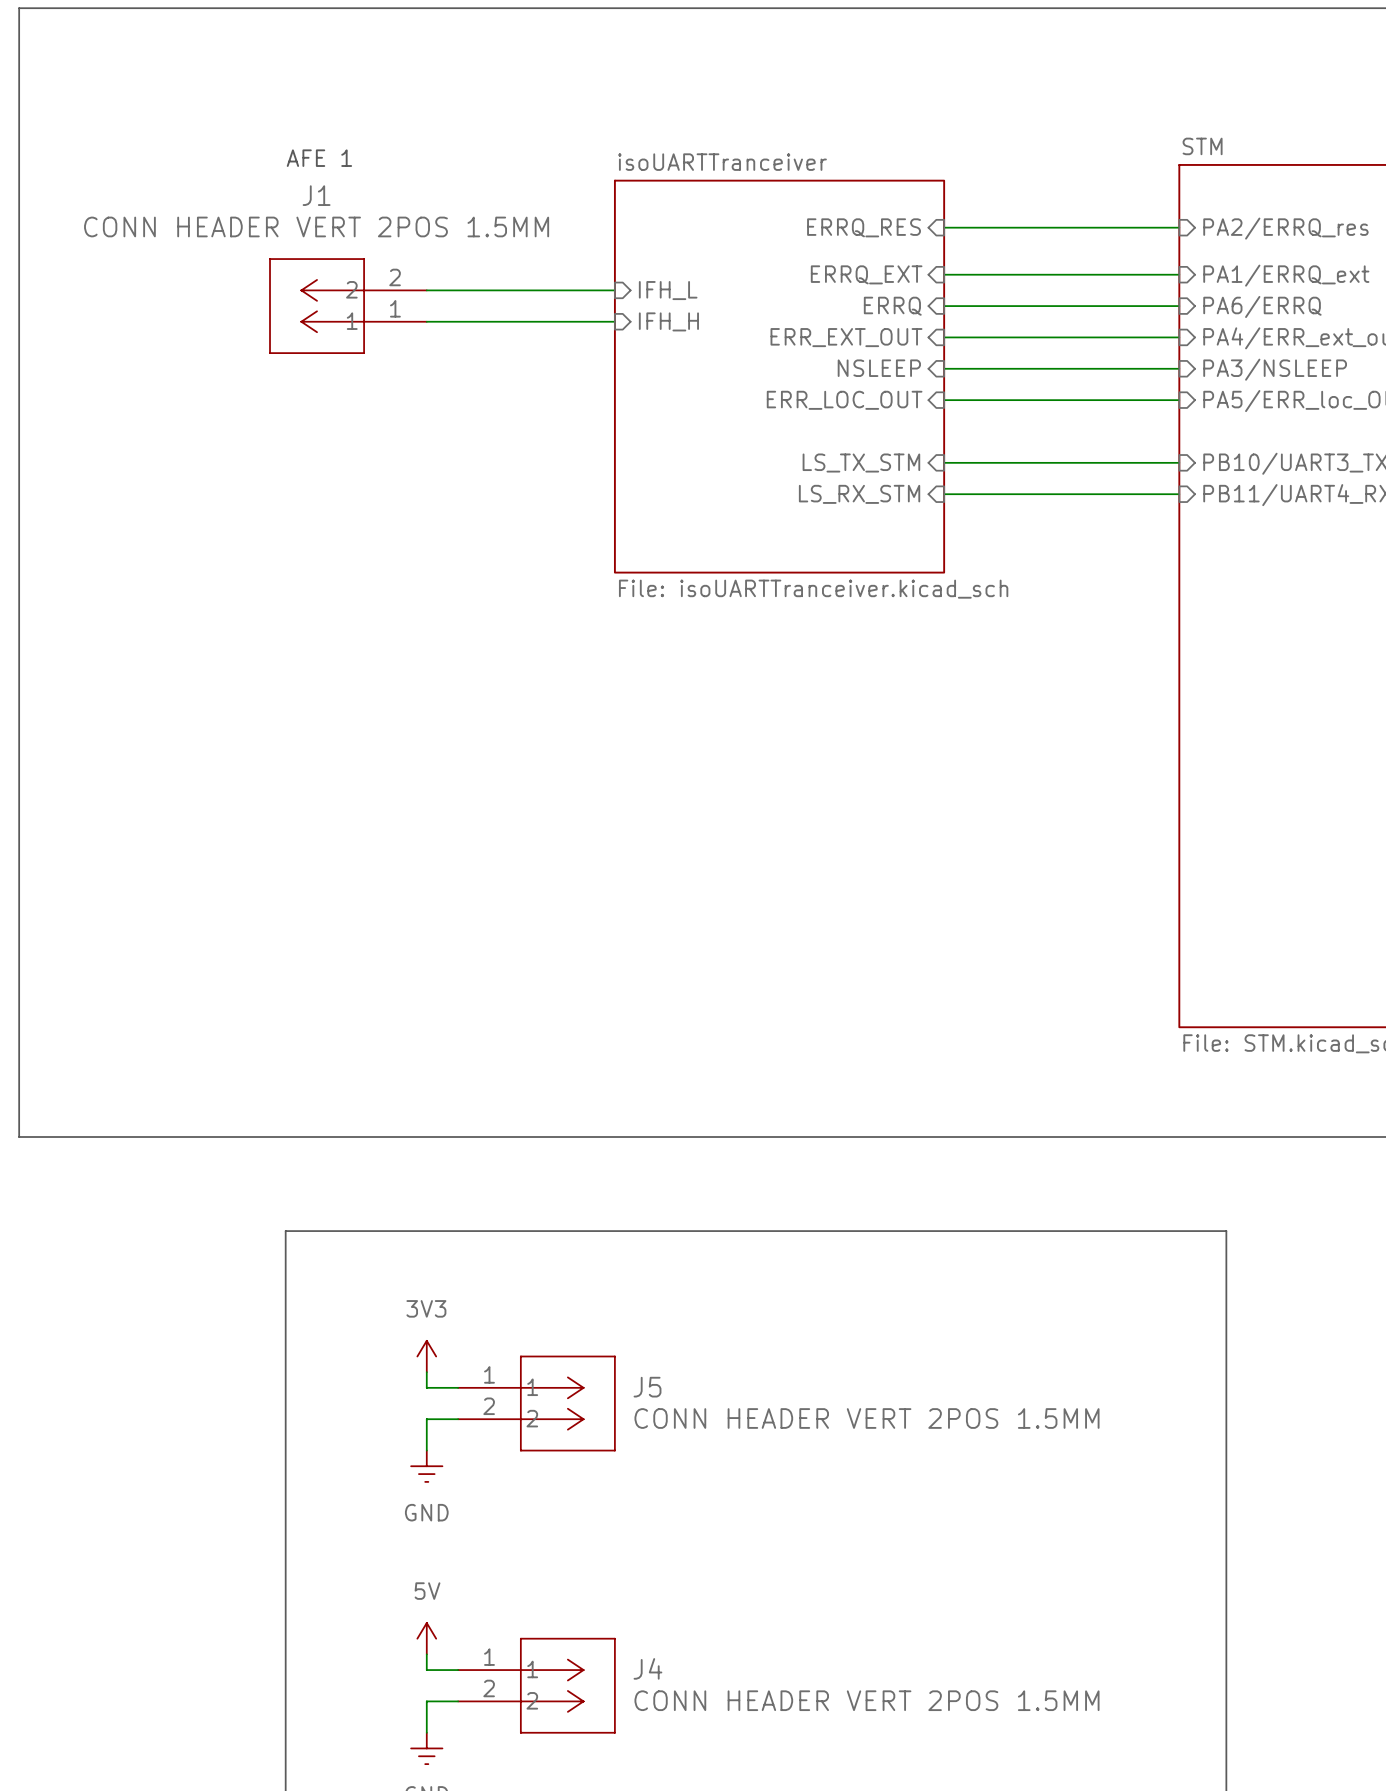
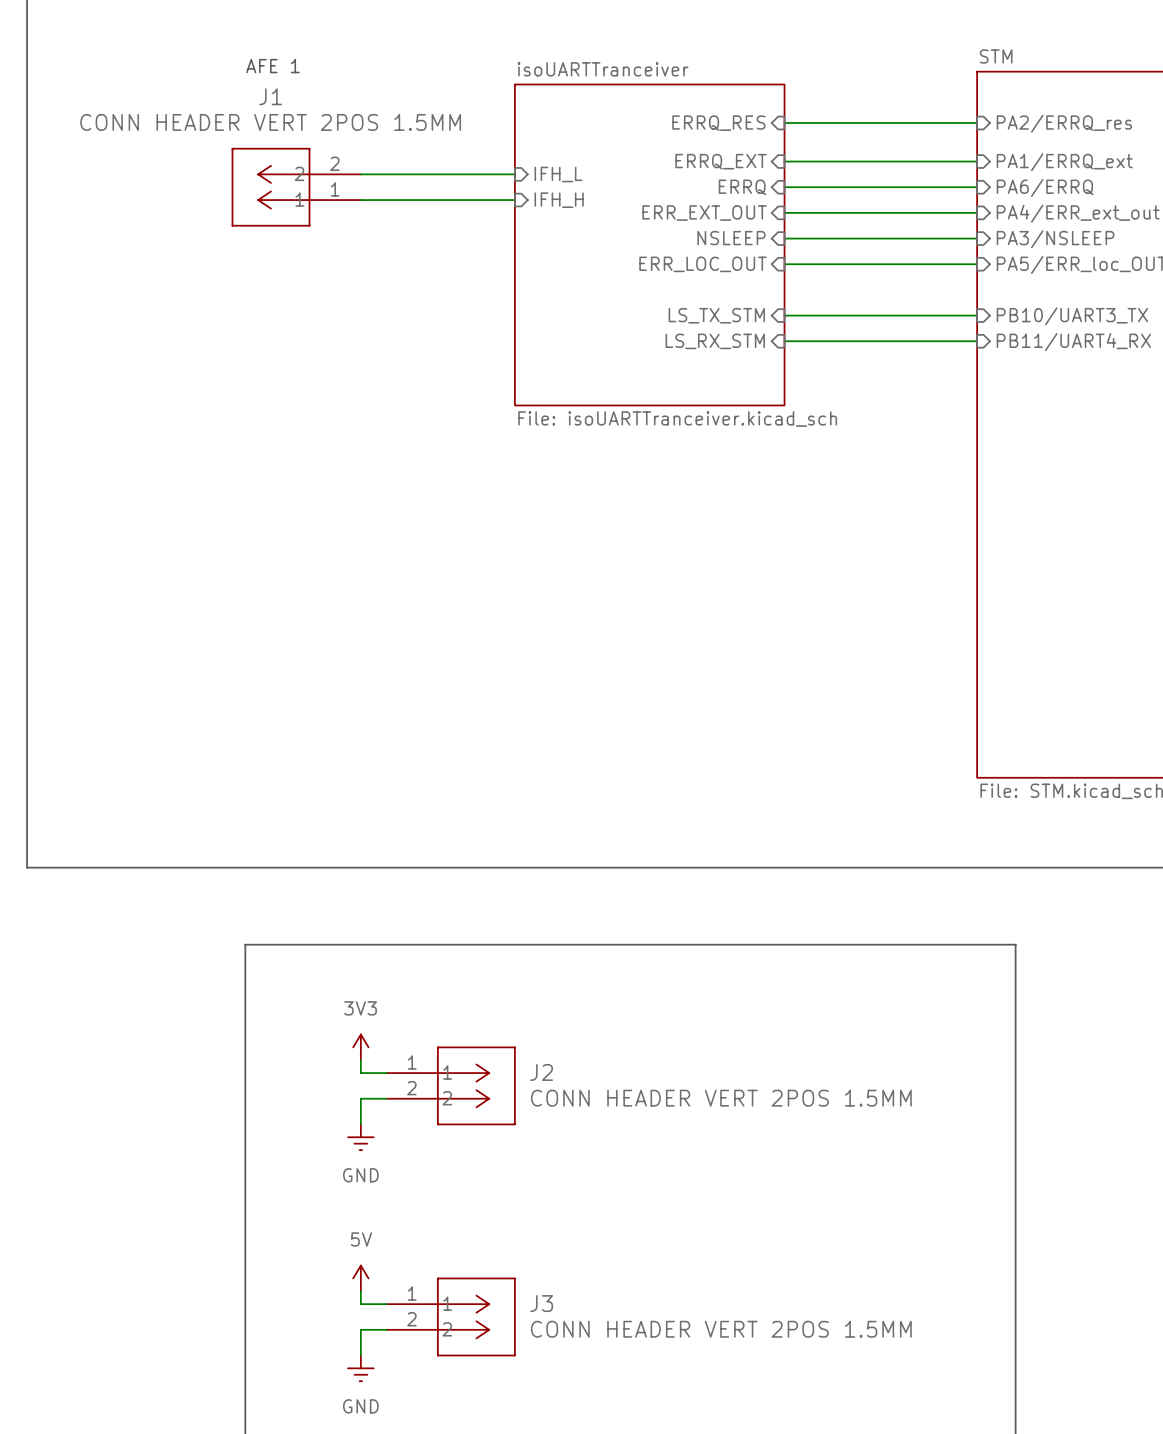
J5 name: J5 (647, 1387) -> J2 (541, 1072)
J4 name: J4 (647, 1668) -> J3 (541, 1303)

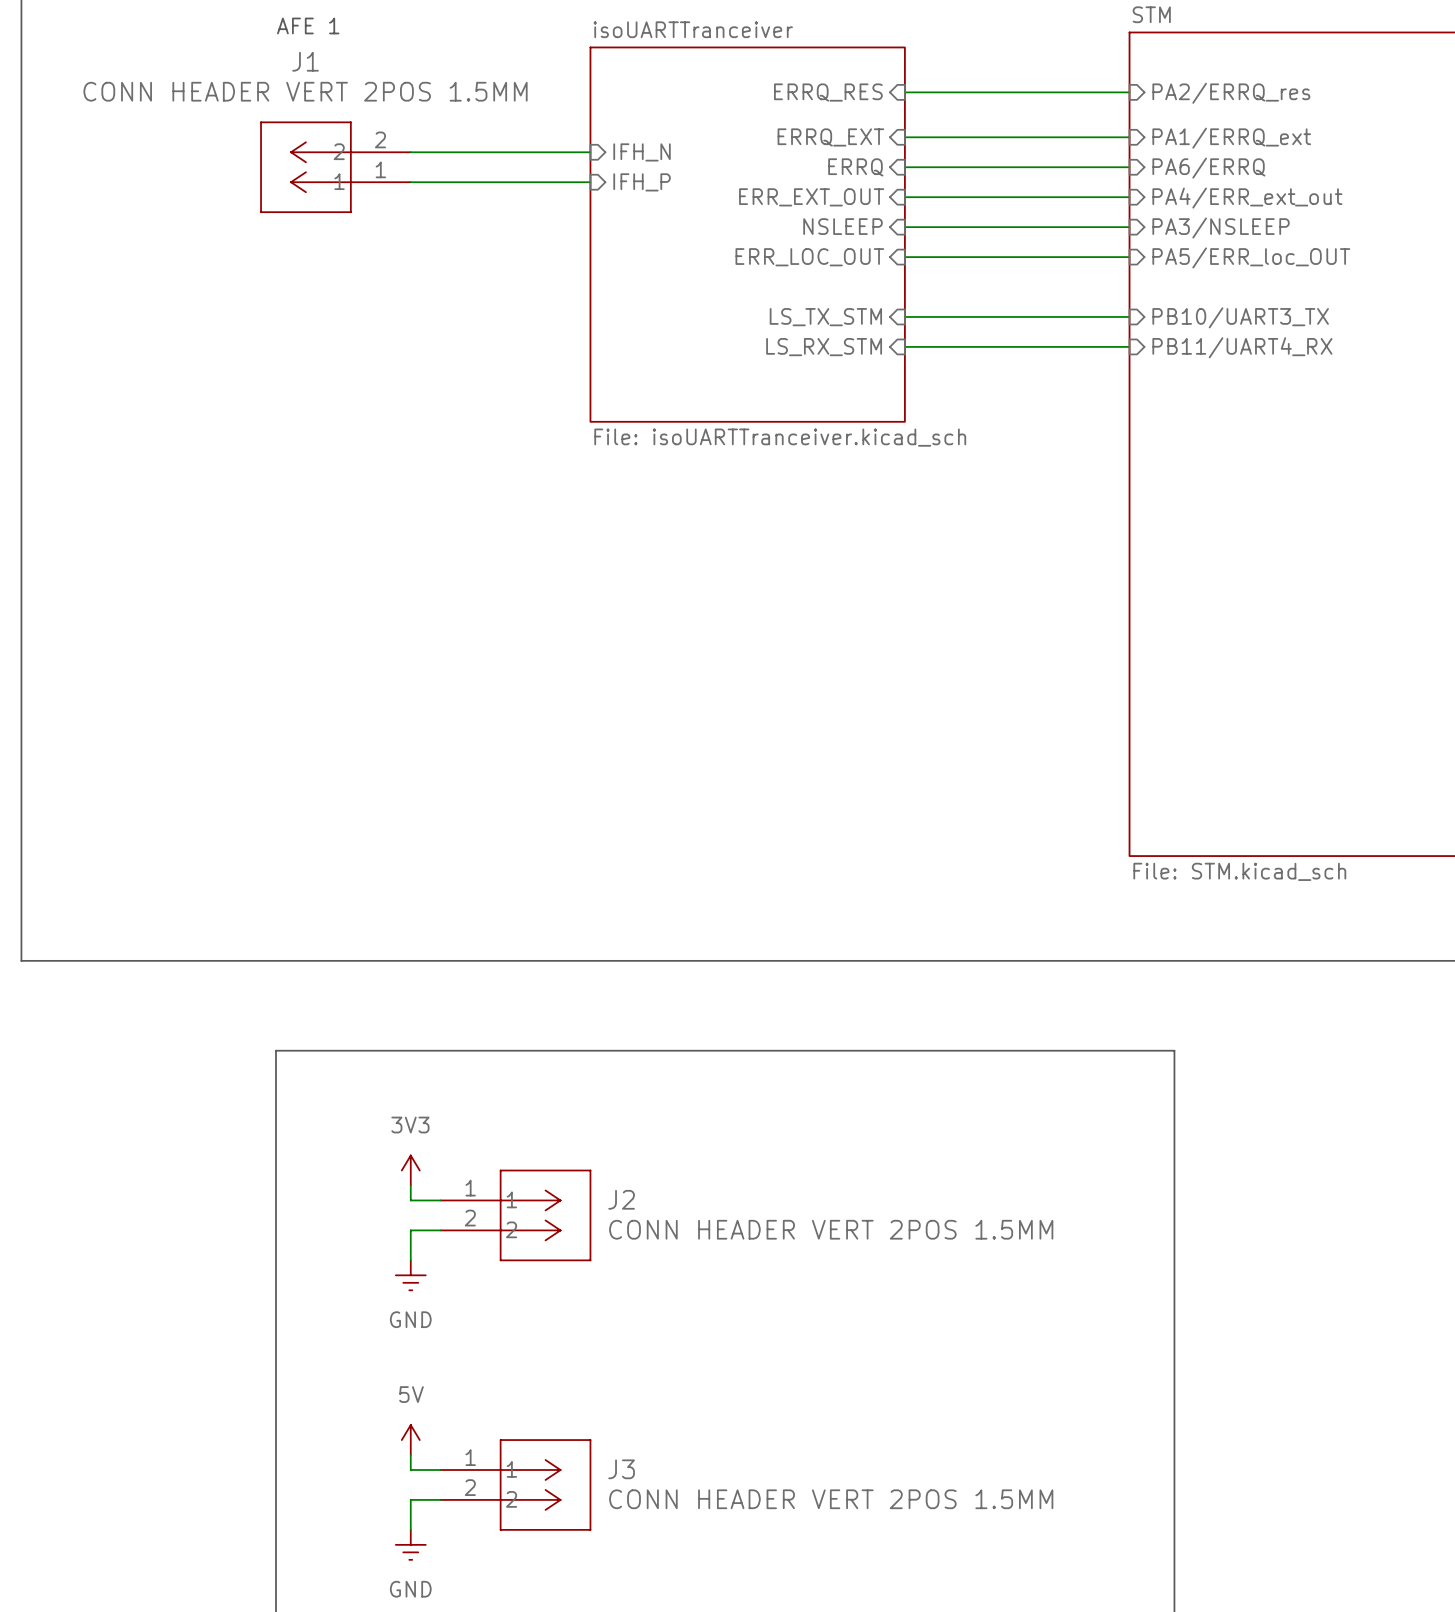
sheet pin: IFH_L (558, 174) -> IFH_N (642, 152)
sheet pin: IFH_H (559, 200) -> IFH_P (642, 182)

